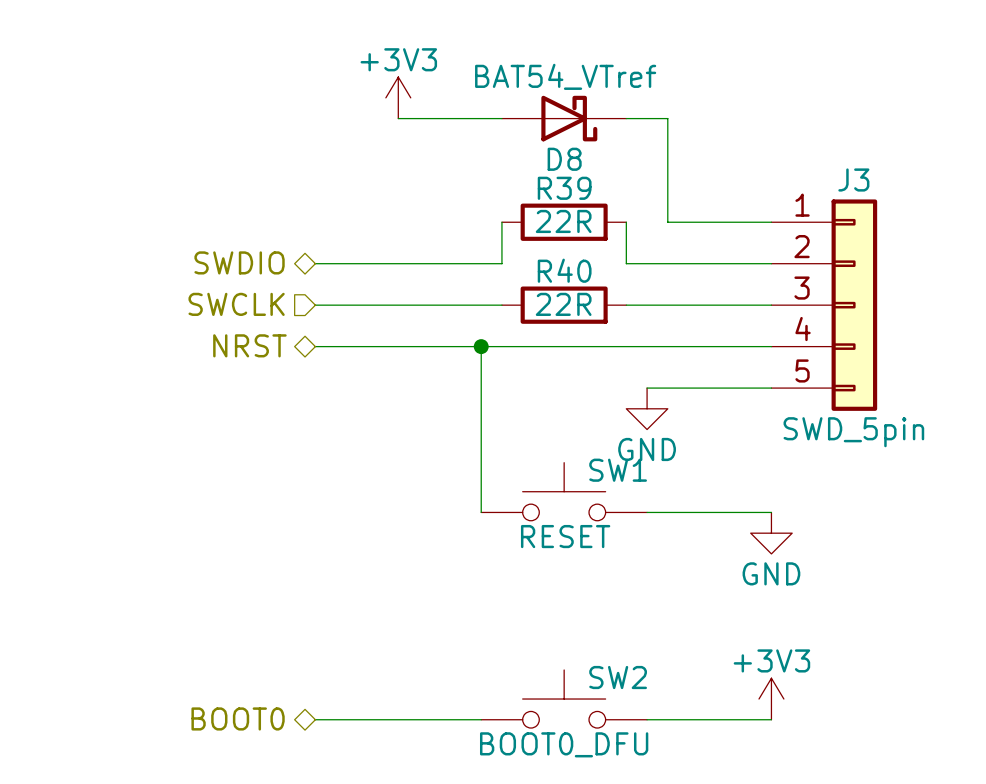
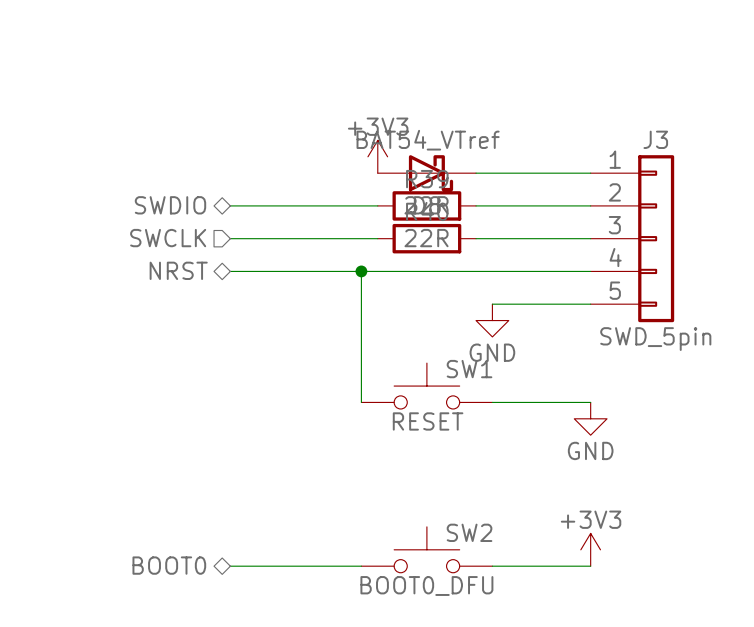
power symbol position: +3V3 (398, 97) -> +3V3 (377, 156)
wire: (398, 118) (501, 118) -> none
D8 position: (564, 118) -> (426, 173)
wire: (626, 118) (667, 118) (667, 222) -> none
wire: (501, 222) (501, 263) -> none
R39 position: (564, 222) -> (426, 205)
wire: (626, 222) (626, 263) -> (476, 173) (508, 173)

